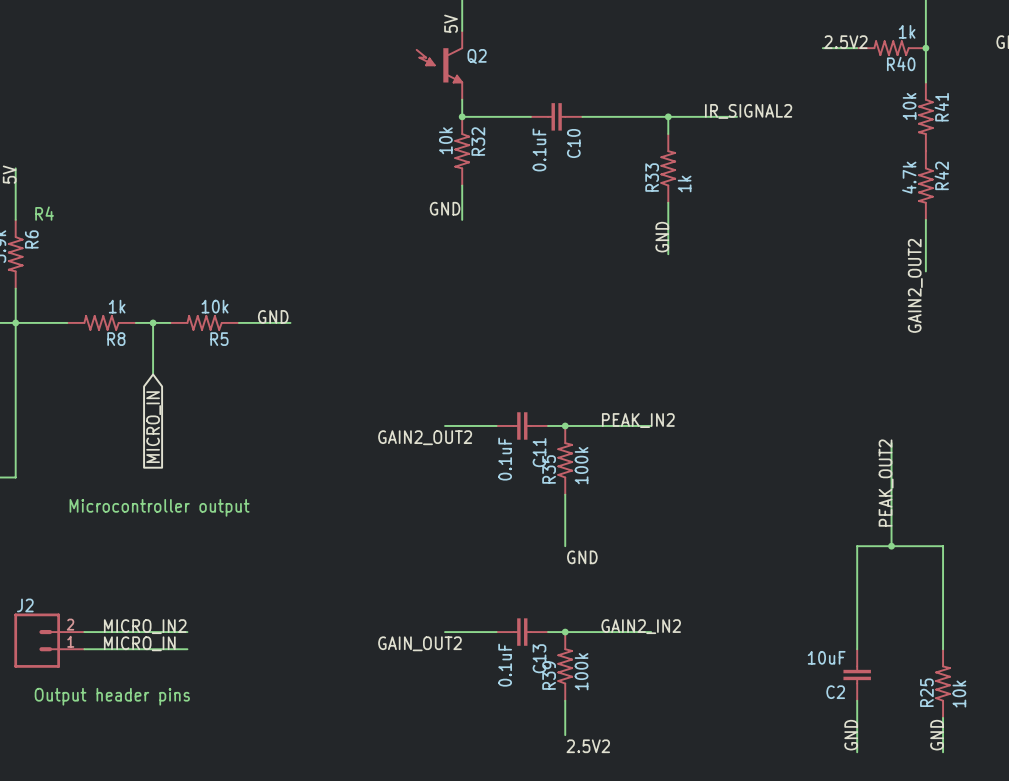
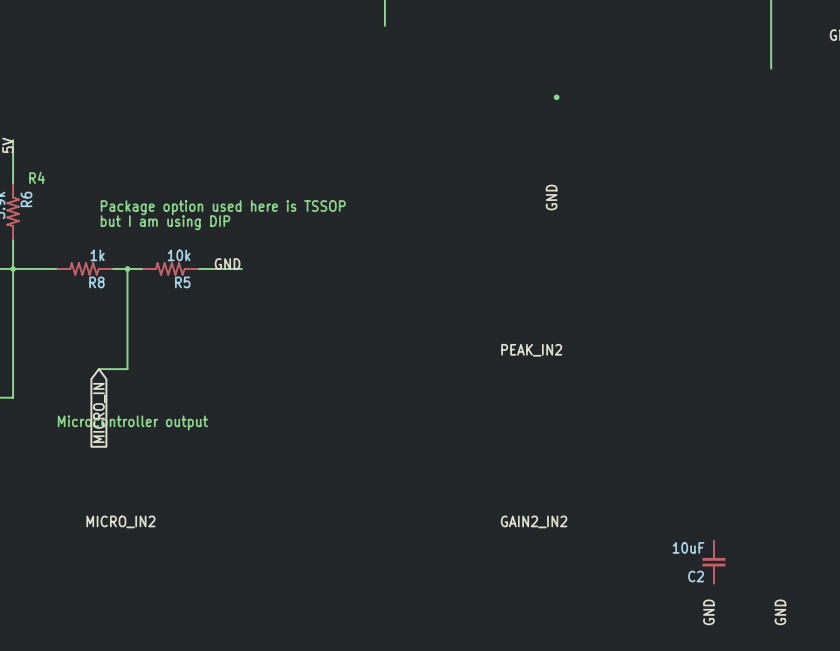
label: 5V (451, 23) -> none
label: 2.5V2 (845, 42) -> none
wire: (822, 48) (857, 48) -> none
R40: 1k (891, 48) -> none
junction: (925, 48) -> none
Q2: (439, 65) -> none
wire: (462, 99) (462, 116) (530, 116) -> none
label: IR_SIGNAL2 (748, 111) -> none
junction: (462, 116) -> none
C10: 0.1uF (556, 116) -> none
wire: (582, 116) (736, 116) -> none
wire: (668, 116) (668, 134) -> none
R41: 10k (925, 116) -> none
R32: 10k (462, 151) -> none
R33: 1k (668, 168) -> none
wire: (462, 185) (462, 219) -> none
R42: 4.7k (925, 185) -> none
wire: (668, 202) (668, 254) -> none
label: GND (445, 208) -> none
wire: (925, 219) (925, 271) -> none
text: none -> Package option used here is TSSOP (223, 207)
text: none -> but I am using DIP (165, 222)
label: GAIN2_OUT2 (915, 285) -> none
wire: none -> (127, 311) (127, 369) (98, 369)
wire: (445, 425) (496, 425) -> none
C11: 0.1uF (522, 425) -> none
wire: (548, 425) (651, 425) -> none
junction: (565, 425) -> none
global label position: MICRO_IN (153, 427) -> MICRO_IN (99, 412)
label: GAIN2_OUT2 (425, 437) -> none
wire: (891, 443) (891, 546) -> none
R35: 100k (565, 460) -> none
label: PEAK_OUT2 (886, 483) -> none
wire: (565, 494) (565, 546) -> none
junction: (891, 546) -> none
label: GND (582, 557) -> none
wire: (84, 632) (187, 632) -> none
wire: (445, 632) (496, 632) -> none
C13: 0.1uF (522, 632) -> none
wire: (548, 632) (651, 632) -> none
junction: (565, 632) -> none
J2: (49, 640) -> none
label: MICRO_IN (139, 643) -> none
label: GAIN_OUT2 (419, 643) -> none
wire: (84, 649) (187, 649) -> none
wire: (857, 649) (857, 546) (943, 546) (943, 649) -> none
R39: 100k (565, 666) -> none
R25: 10k (943, 683) -> none
text: Output header pins (112, 696) -> none
wire: (565, 700) (565, 735) -> none
wire: (857, 700) (857, 752) -> none
wire: (943, 717) (943, 752) -> none
label: 2.5V2 (588, 746) -> none

